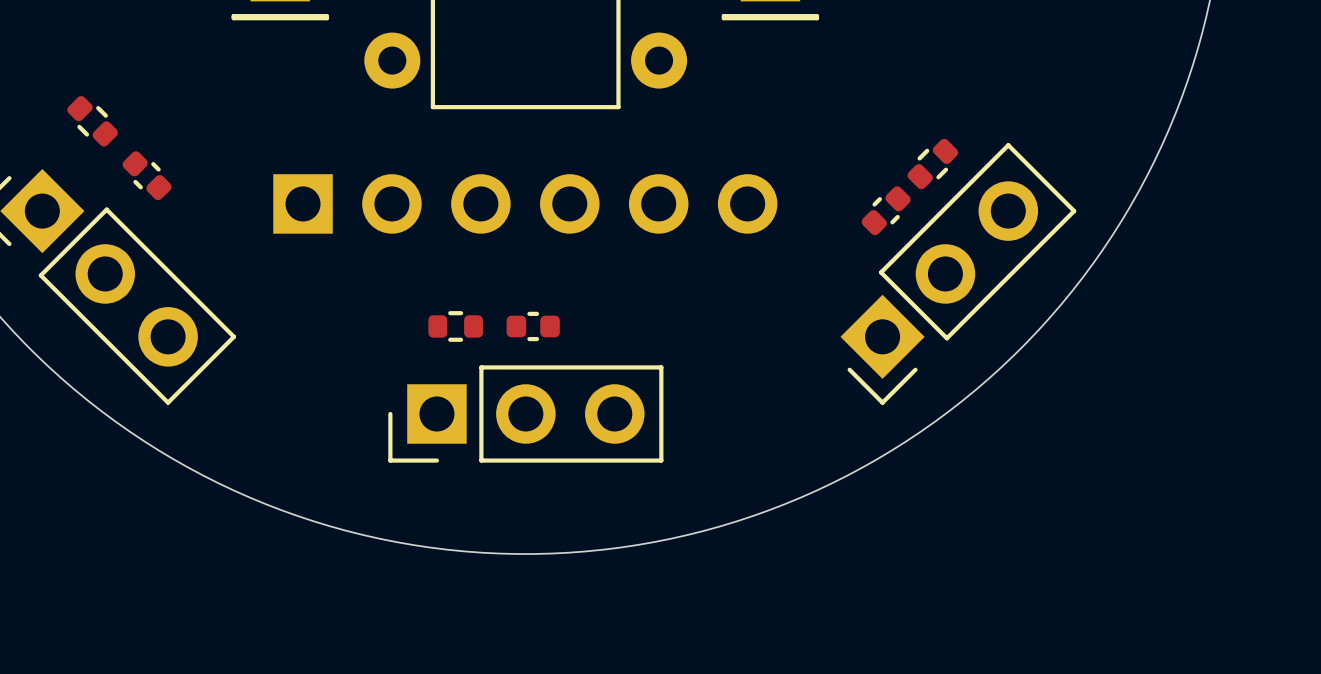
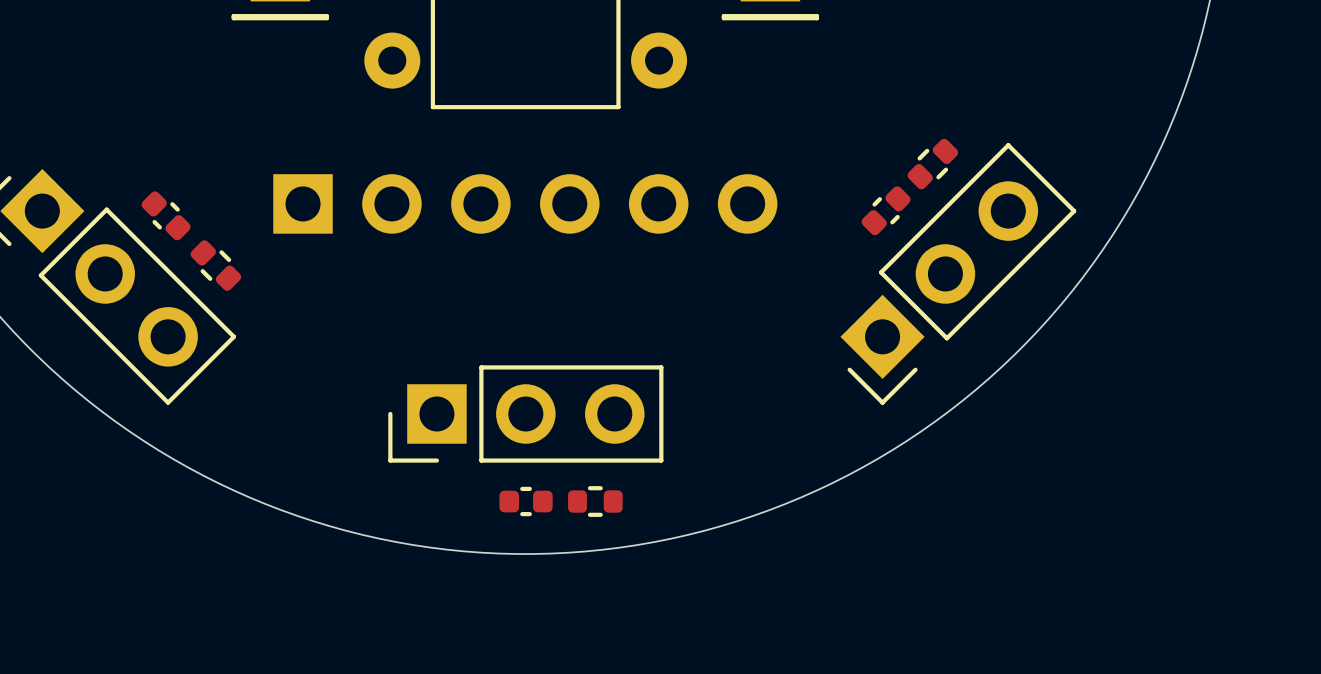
part position: (92, 121) -> (215, 265)
part position: (147, 175) -> (166, 215)
part position: (455, 326) -> (595, 501)
part position: (533, 326) -> (526, 501)

